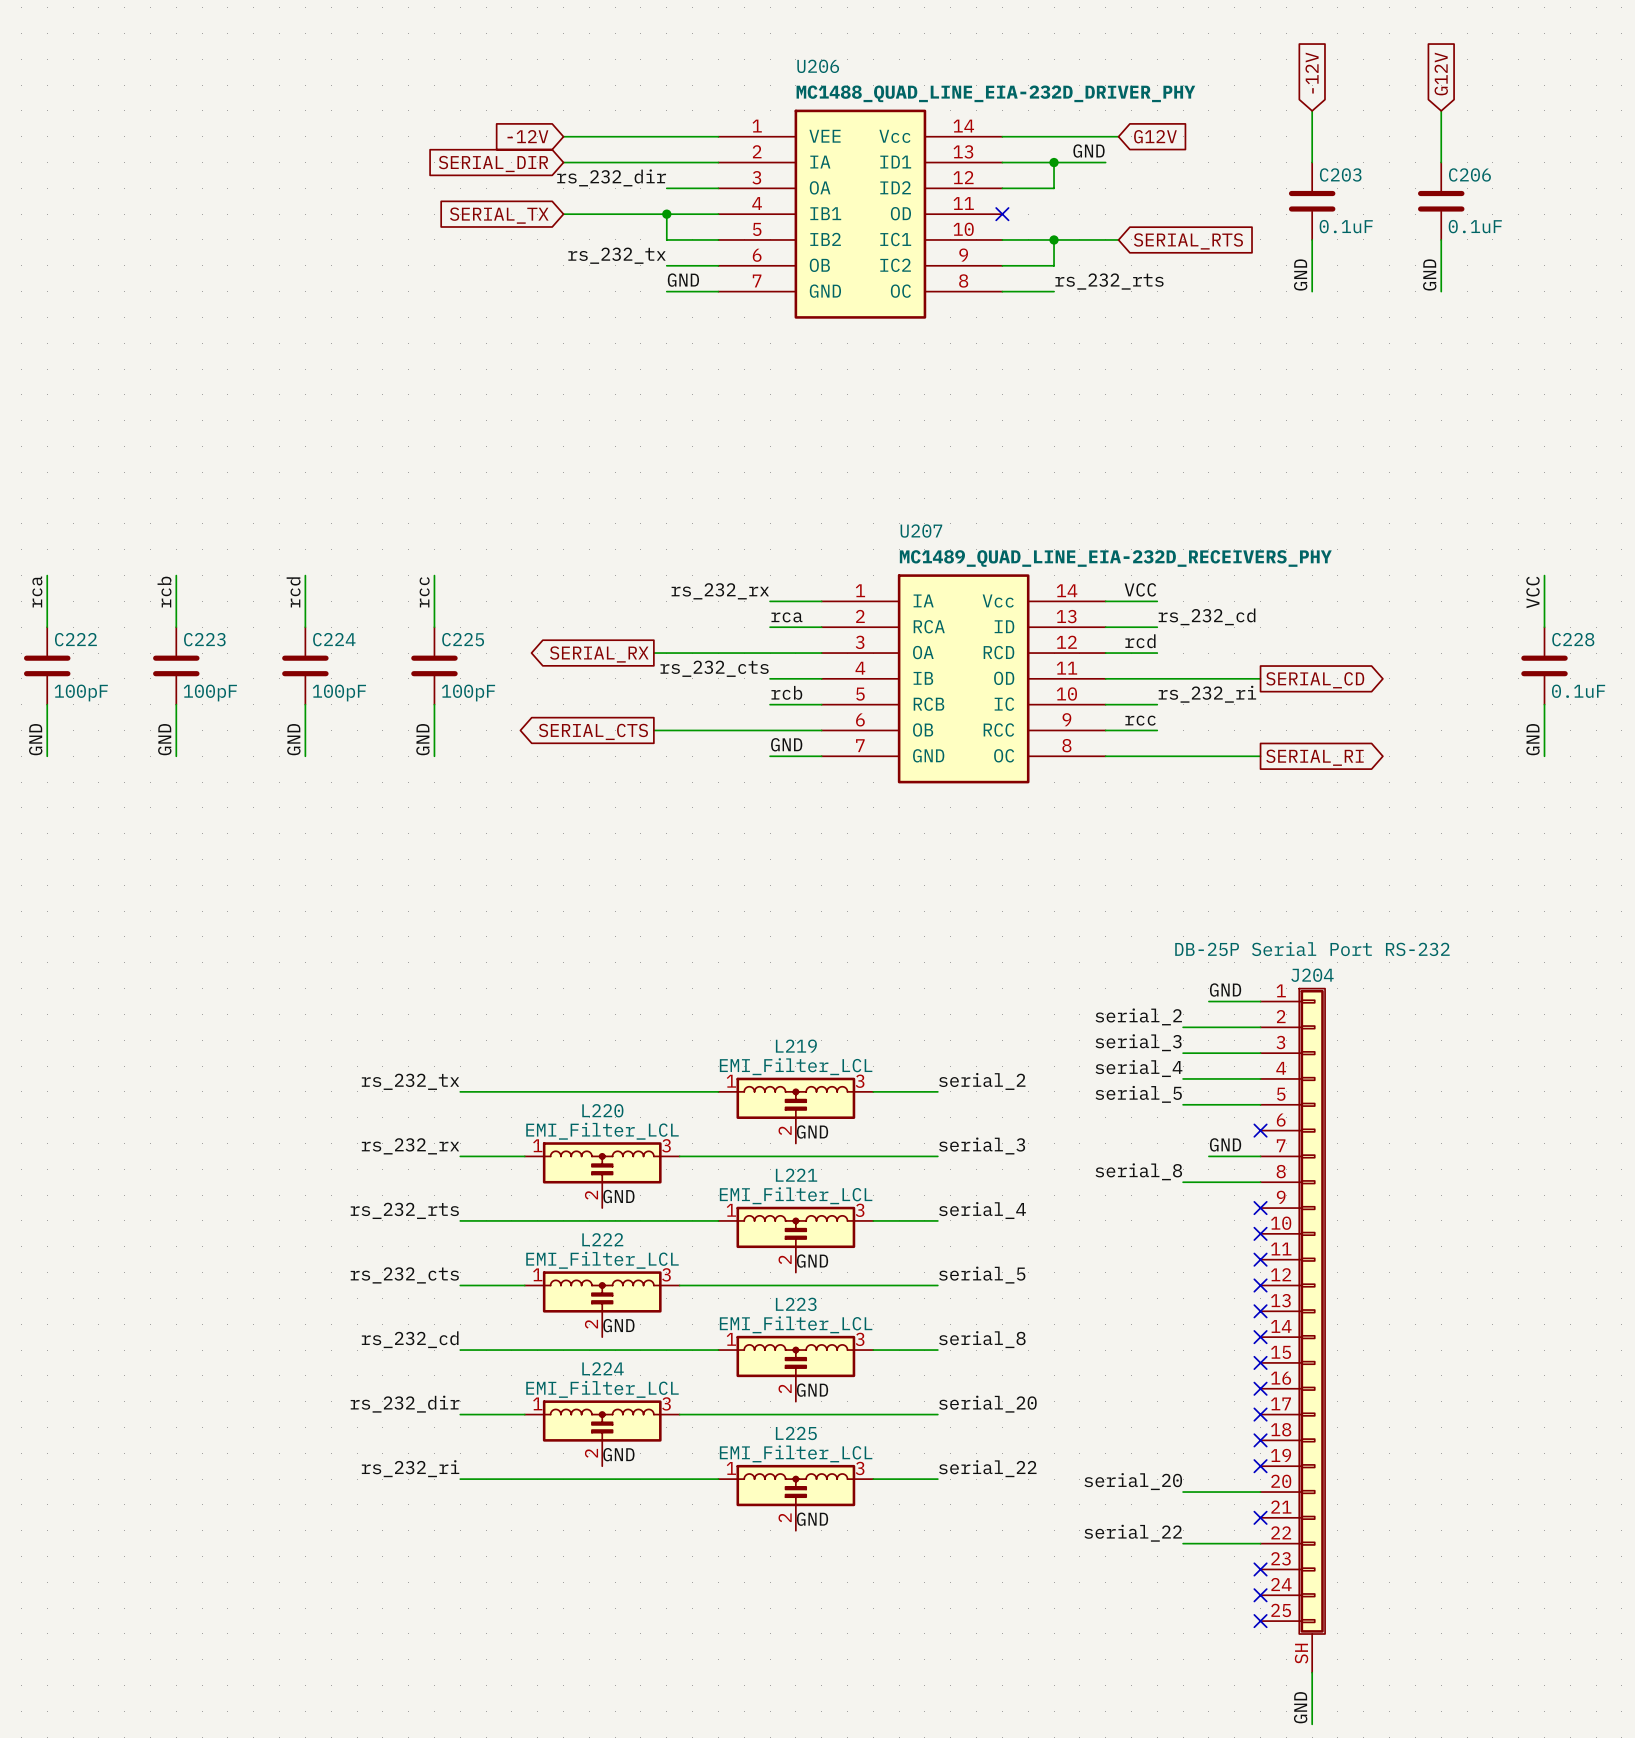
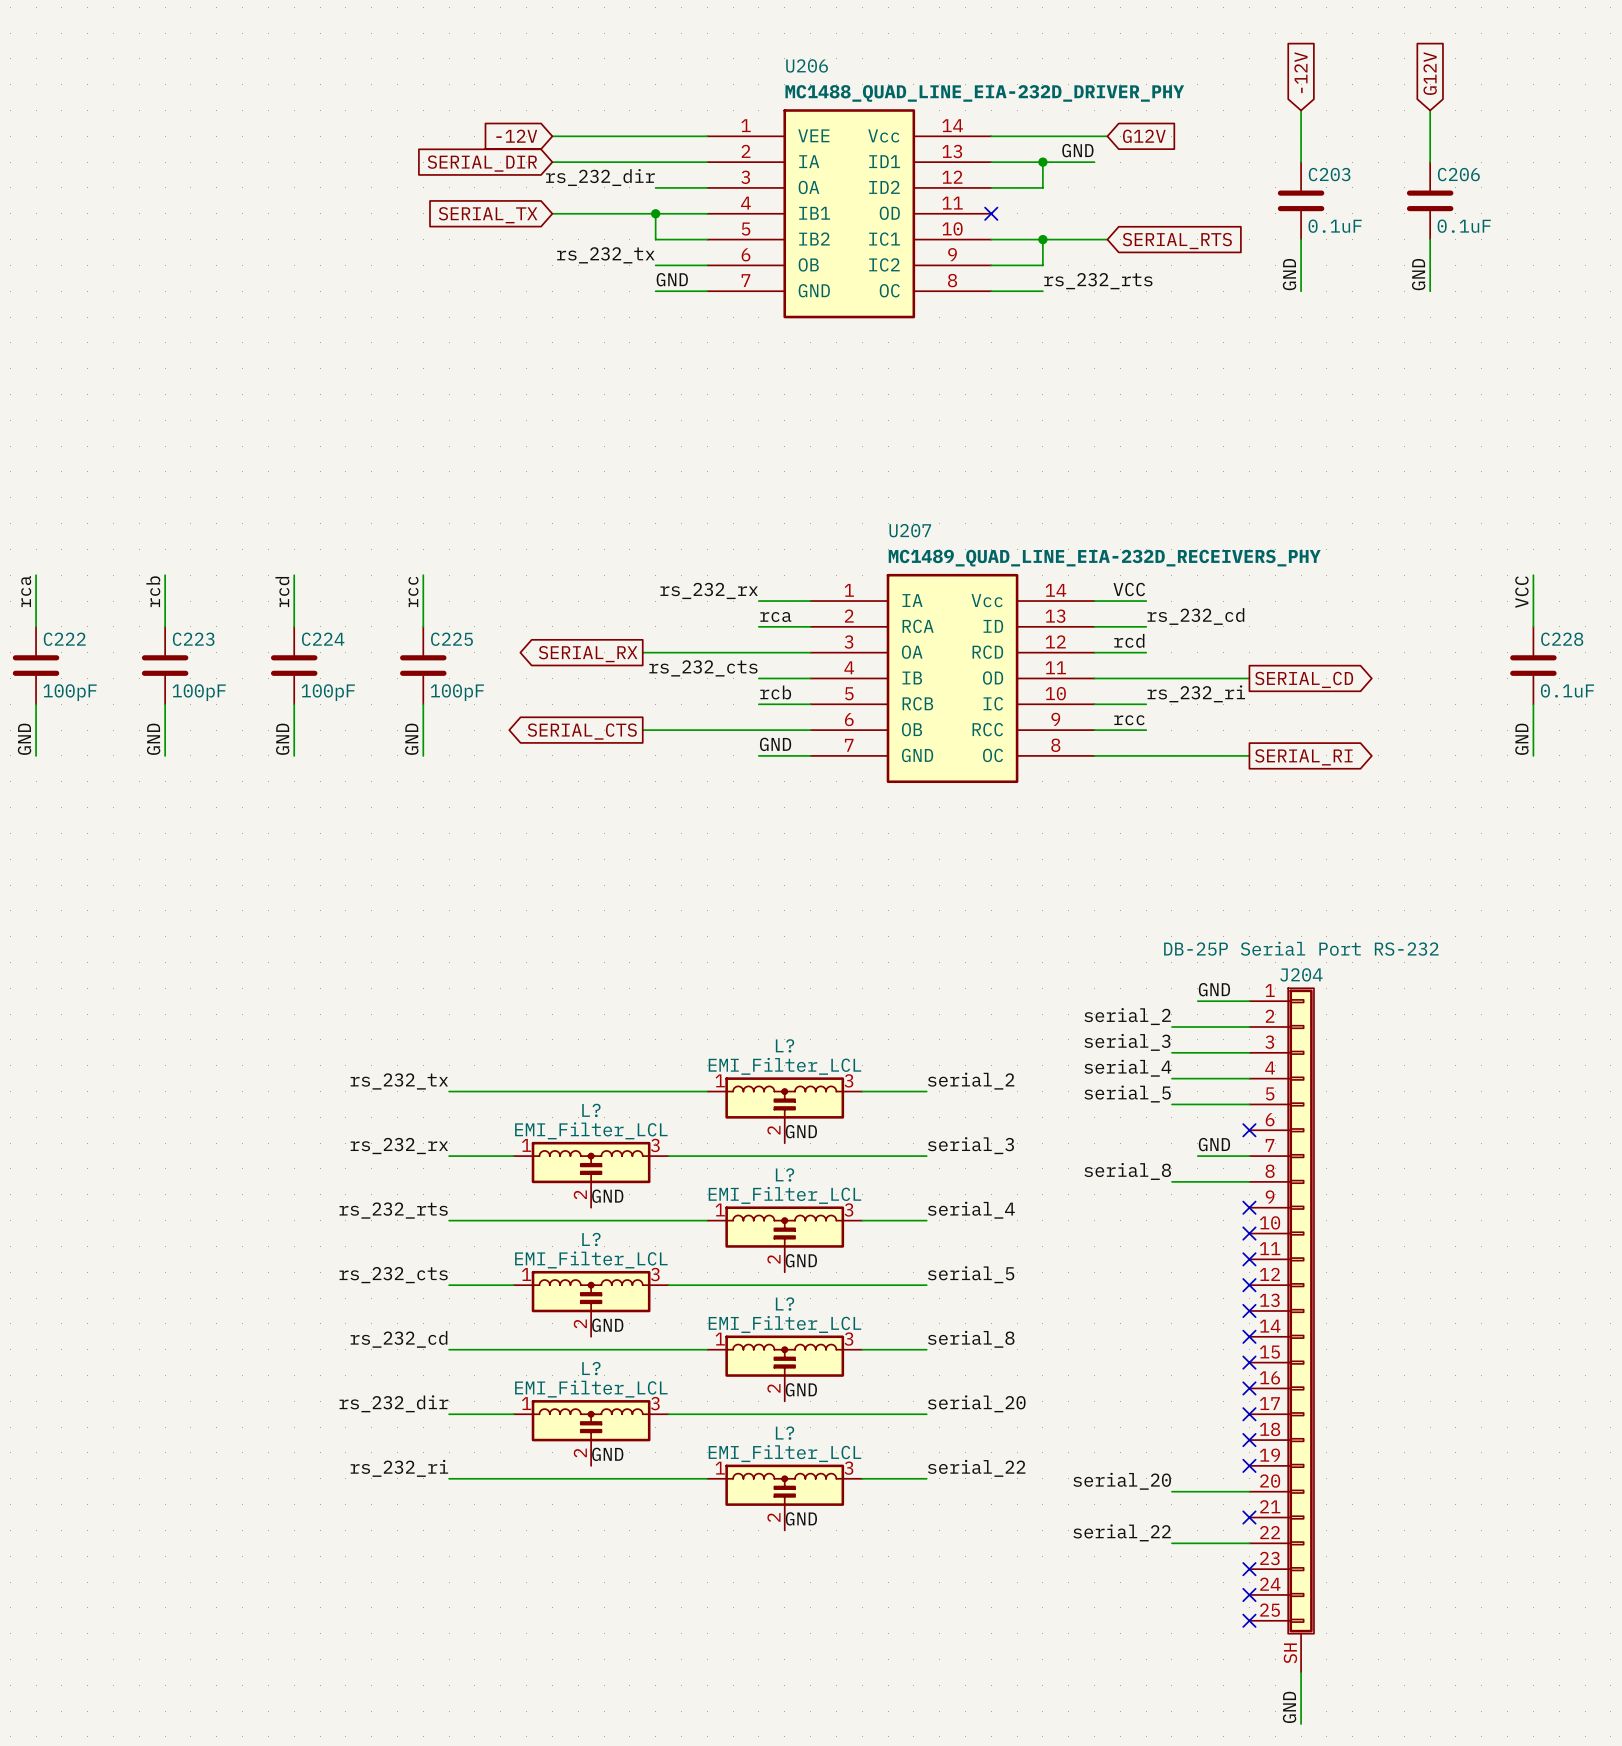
L219: EMI_Filter_LCL (795, 1110) -> none
L?: none -> EMI_Filter_LCL (784, 1110)
L220: EMI_Filter_LCL (602, 1175) -> none
L?: none -> EMI_Filter_LCL (591, 1174)
L221: EMI_Filter_LCL (795, 1239) -> none
L?: none -> EMI_Filter_LCL (784, 1239)
L222: EMI_Filter_LCL (602, 1304) -> none
L?: none -> EMI_Filter_LCL (591, 1303)
L223: EMI_Filter_LCL (795, 1368) -> none
L?: none -> EMI_Filter_LCL (784, 1368)
L224: EMI_Filter_LCL (602, 1433) -> none
L?: none -> EMI_Filter_LCL (591, 1432)
L225: EMI_Filter_LCL (795, 1497) -> none
L?: none -> EMI_Filter_LCL (784, 1497)

